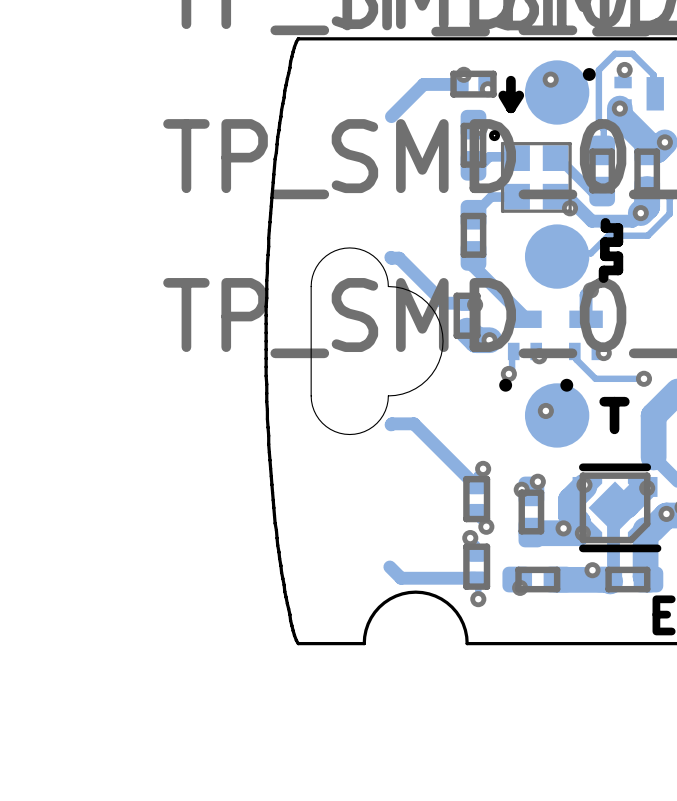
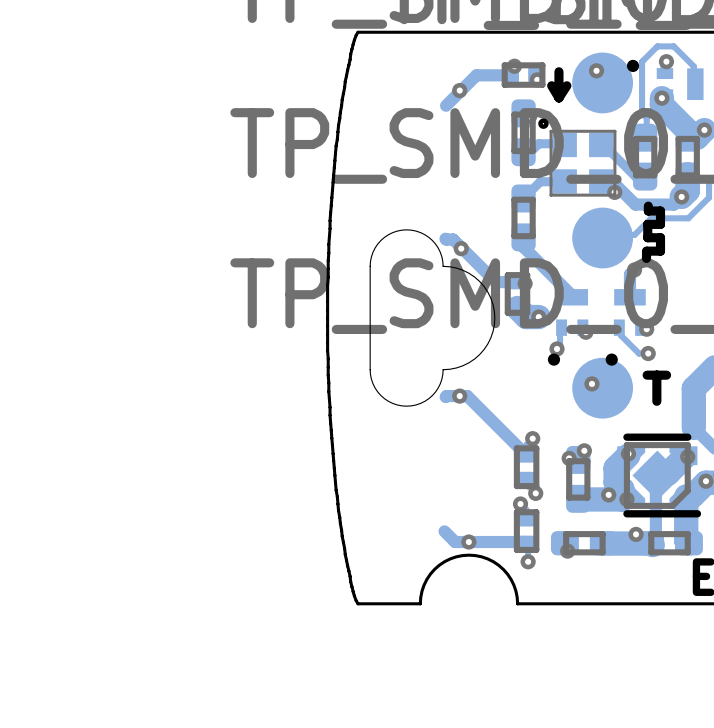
via: none -> (459, 90)
via: none -> (461, 248)
track: (643, 378) (605, 378) -> none
via position: (643, 378) -> (648, 353)
via: none -> (459, 396)
via: none -> (468, 542)

